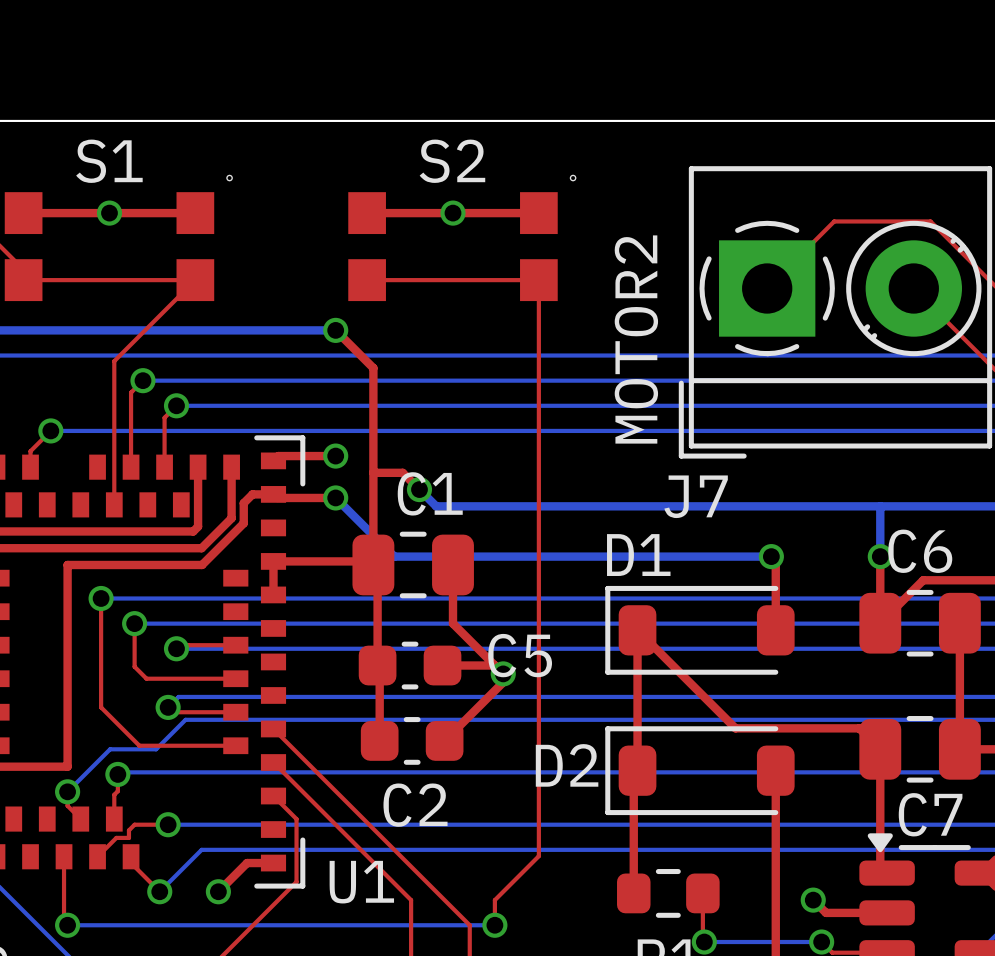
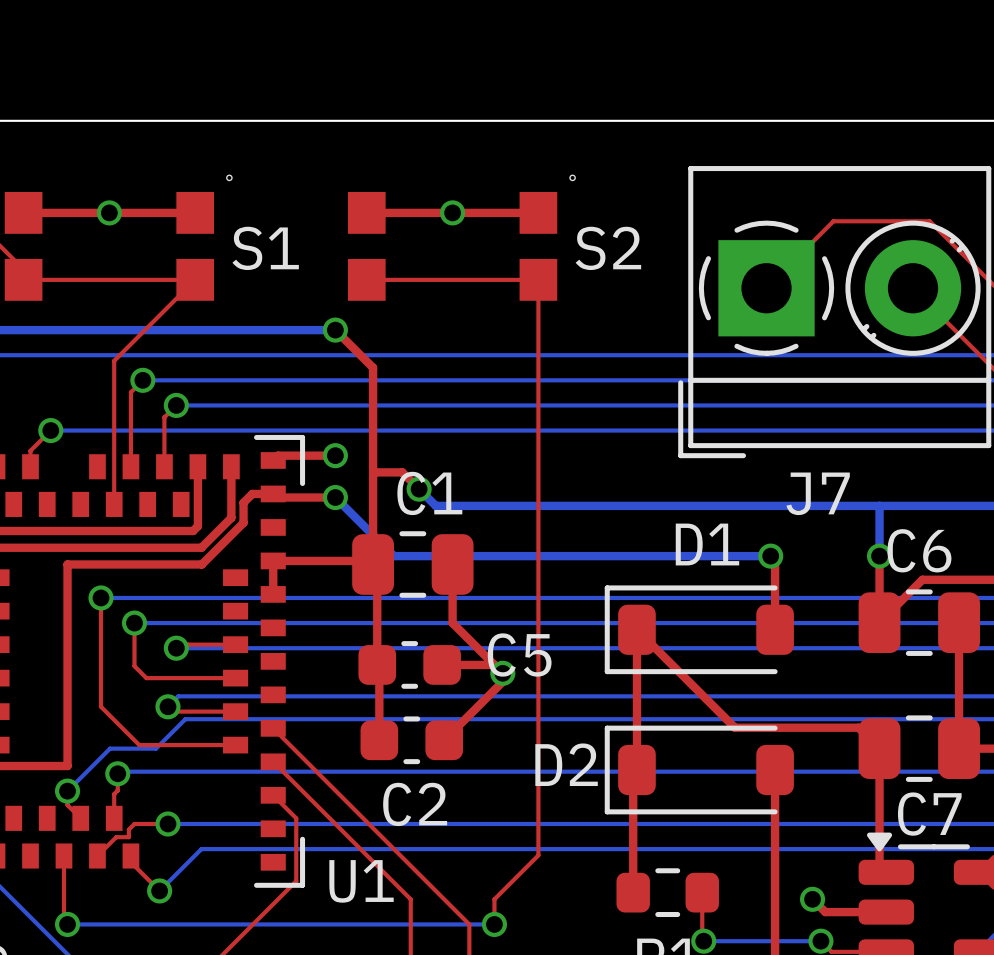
S1 name position: S1 (109, 161) -> S1 (265, 248)
S2 name position: S2 (452, 161) -> S2 (608, 248)
text: MOTOR2 (636, 339) -> none
J7 name position: J7 (696, 496) -> J7 (818, 493)
D1 name position: D1 (638, 555) -> D1 (707, 544)
top track: (273, 863) (247, 863) (218, 891) -> none
via: (218, 891) -> none

